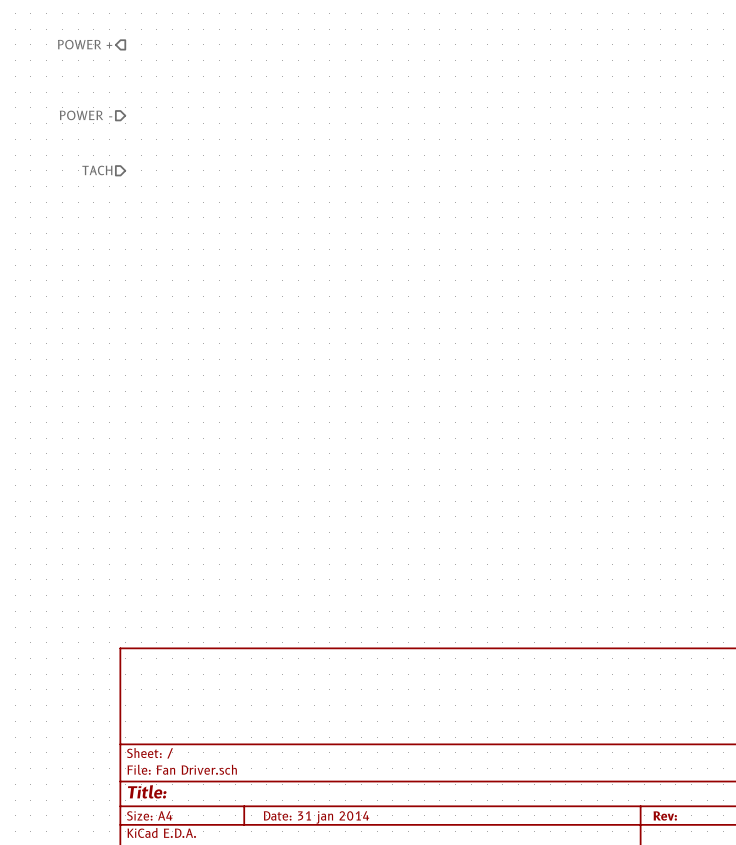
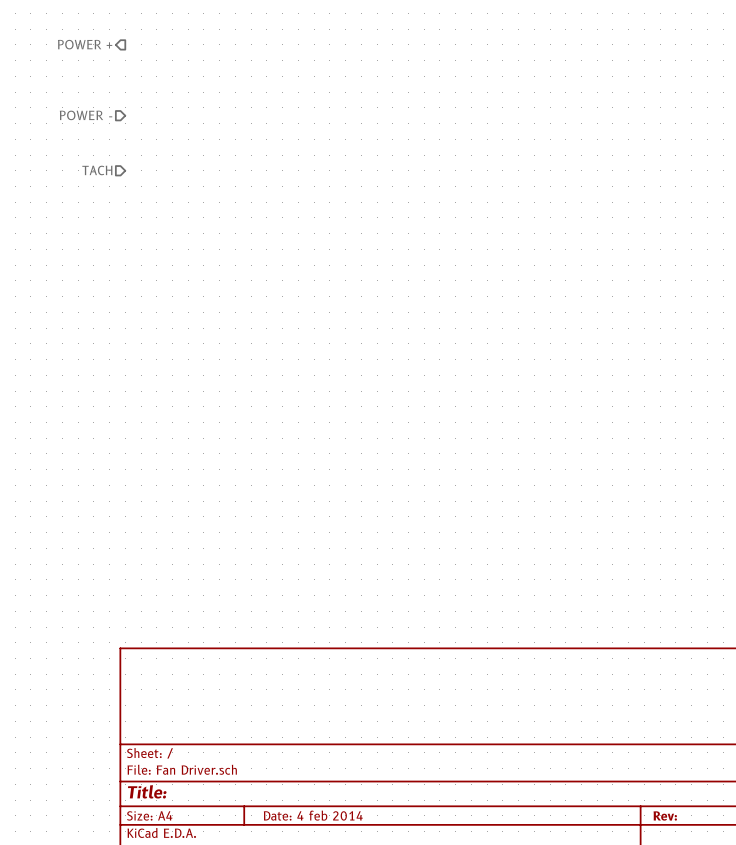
title block: Date: 31 jan 2014 (316, 817) -> Date: 4 feb 2014 (313, 815)

